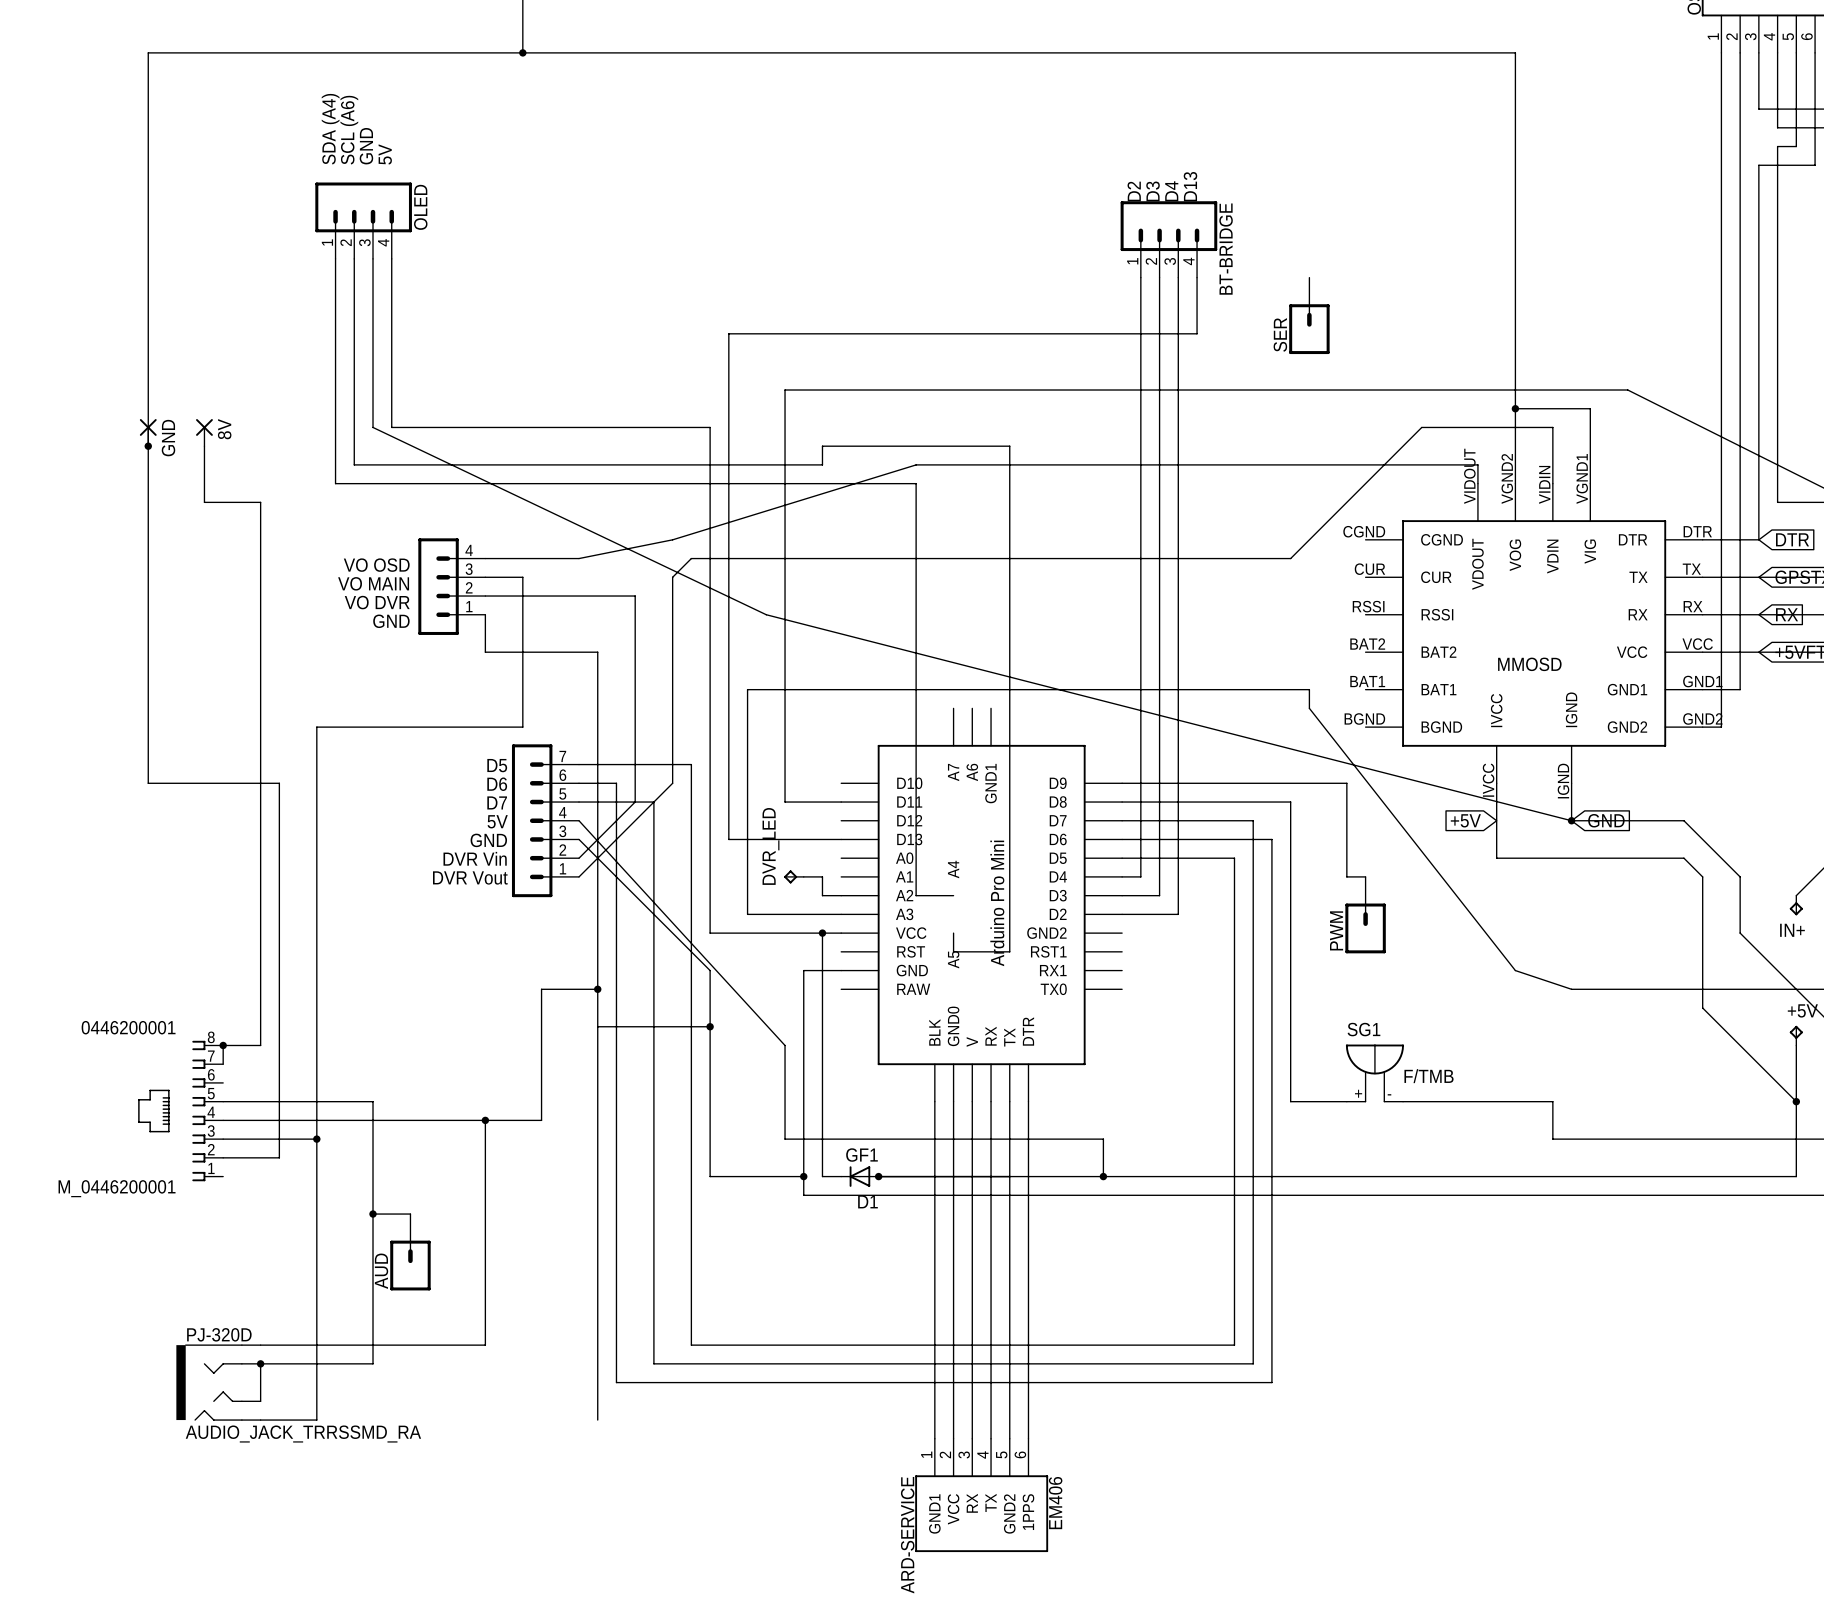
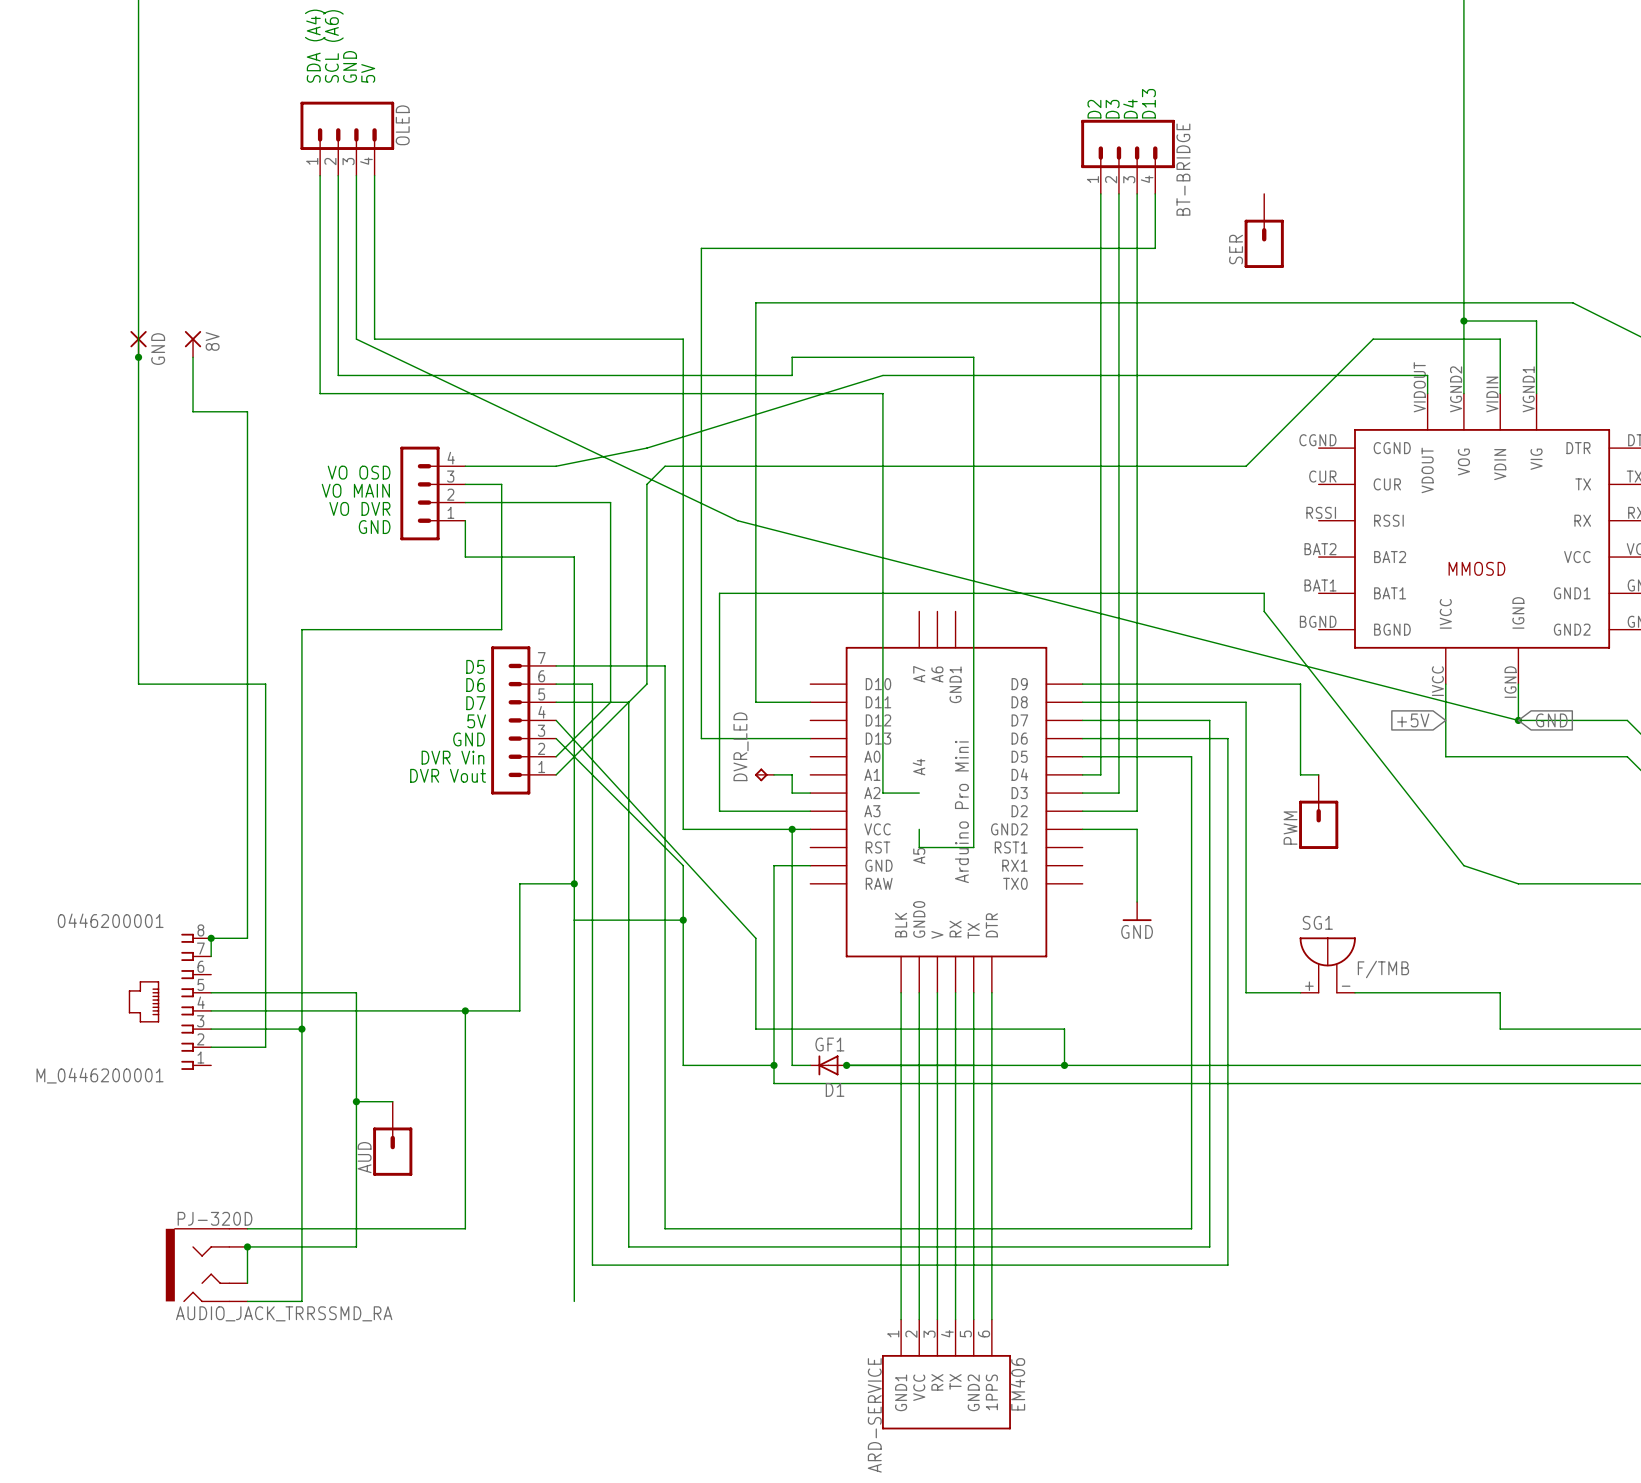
wire: none -> (1082, 829) (1137, 829) (1137, 901)
power symbol: none -> GND (1137, 911)

